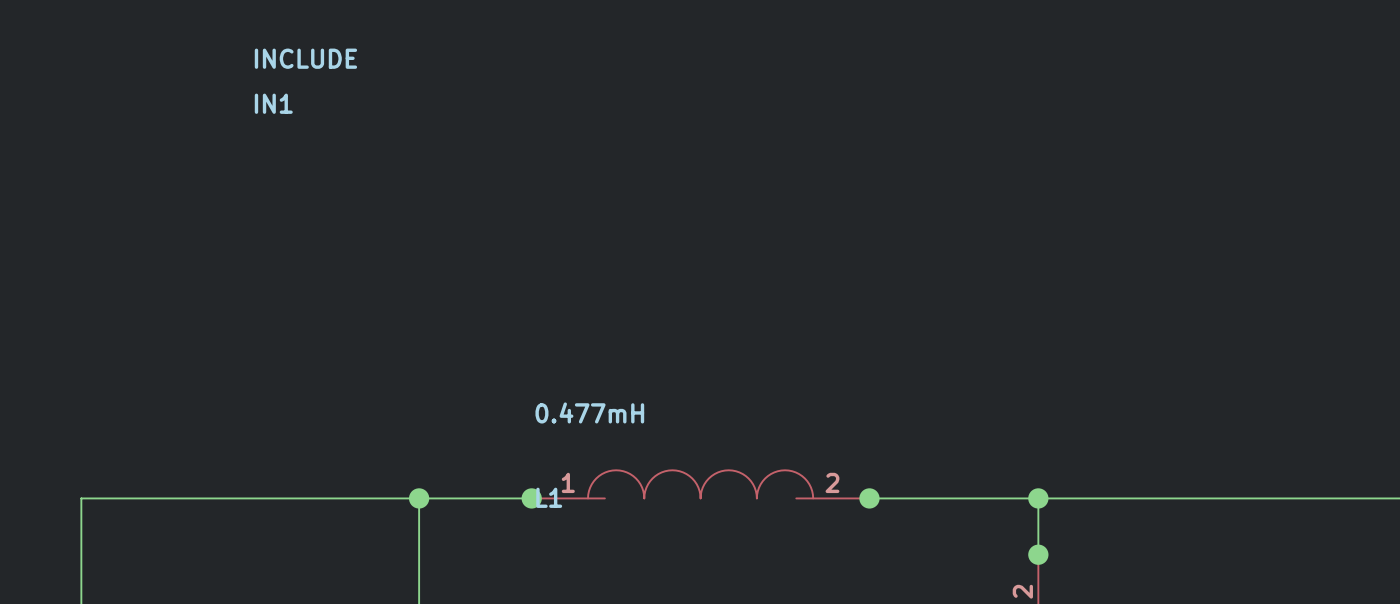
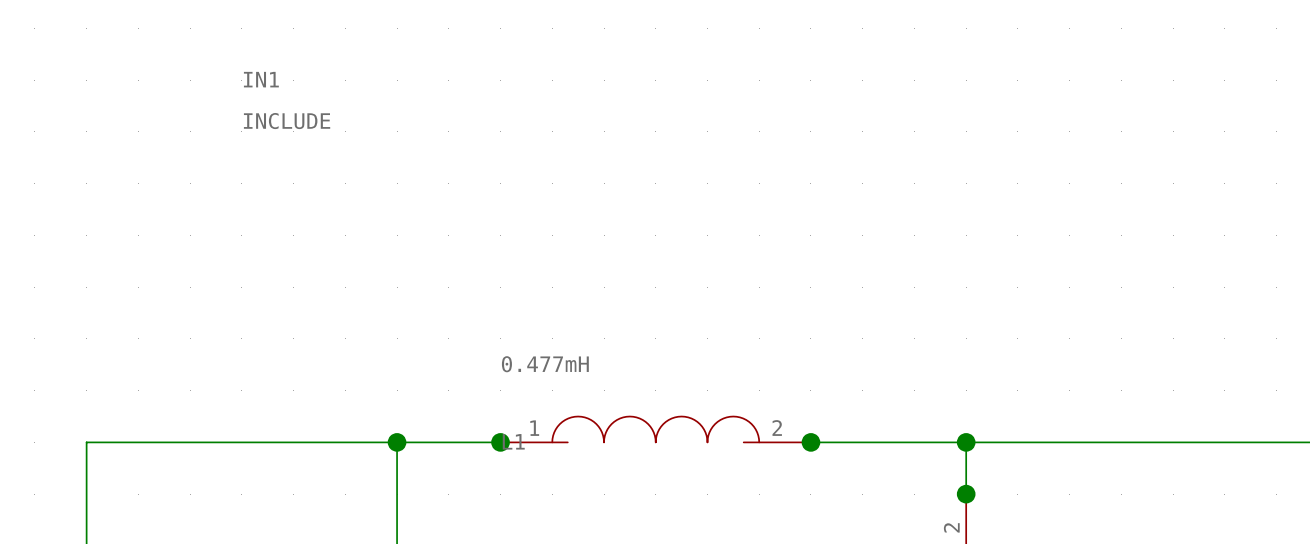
IN1 value position: INCLUDE (305, 58) -> INCLUDE (287, 121)
IN1 position: (305, 81) -> (287, 100)

